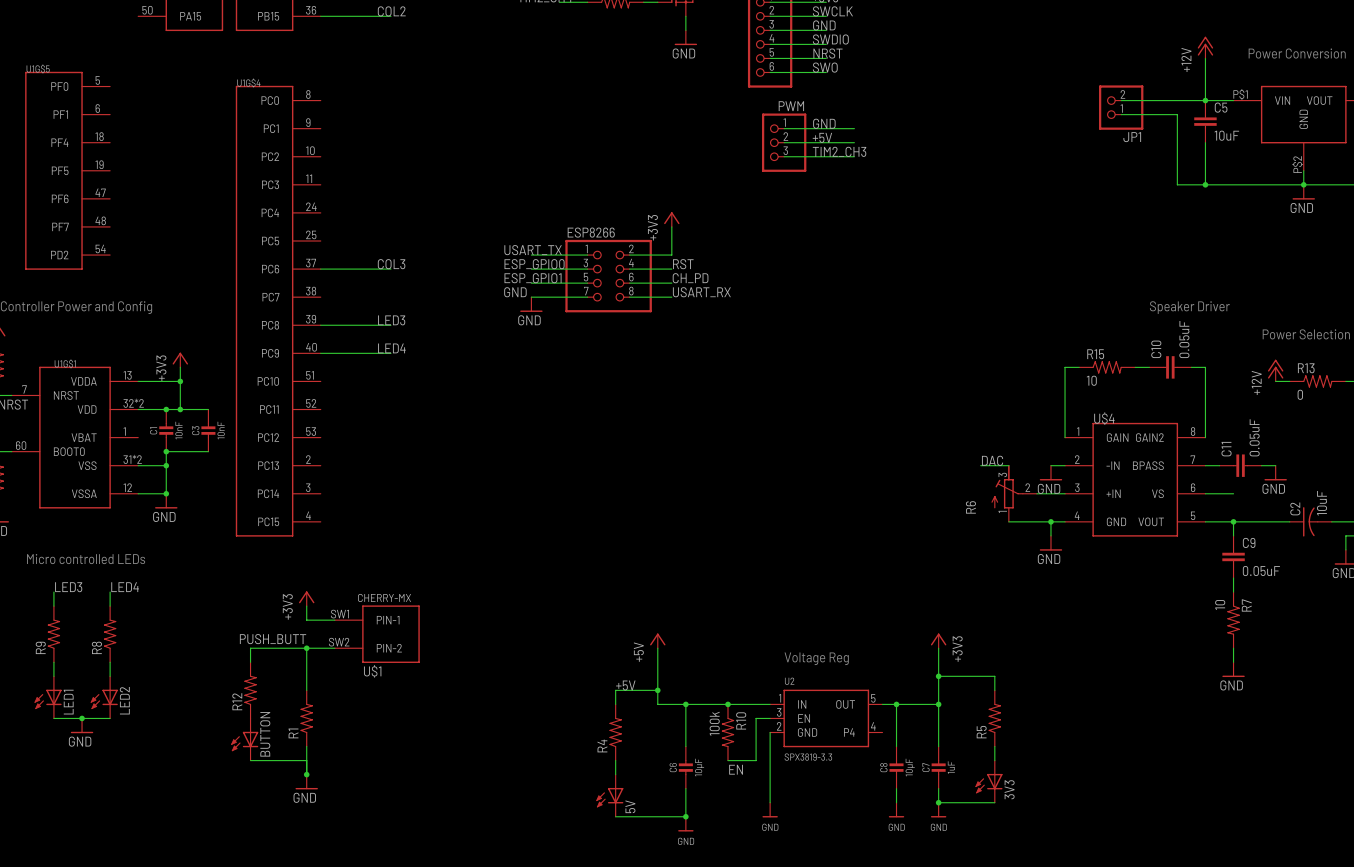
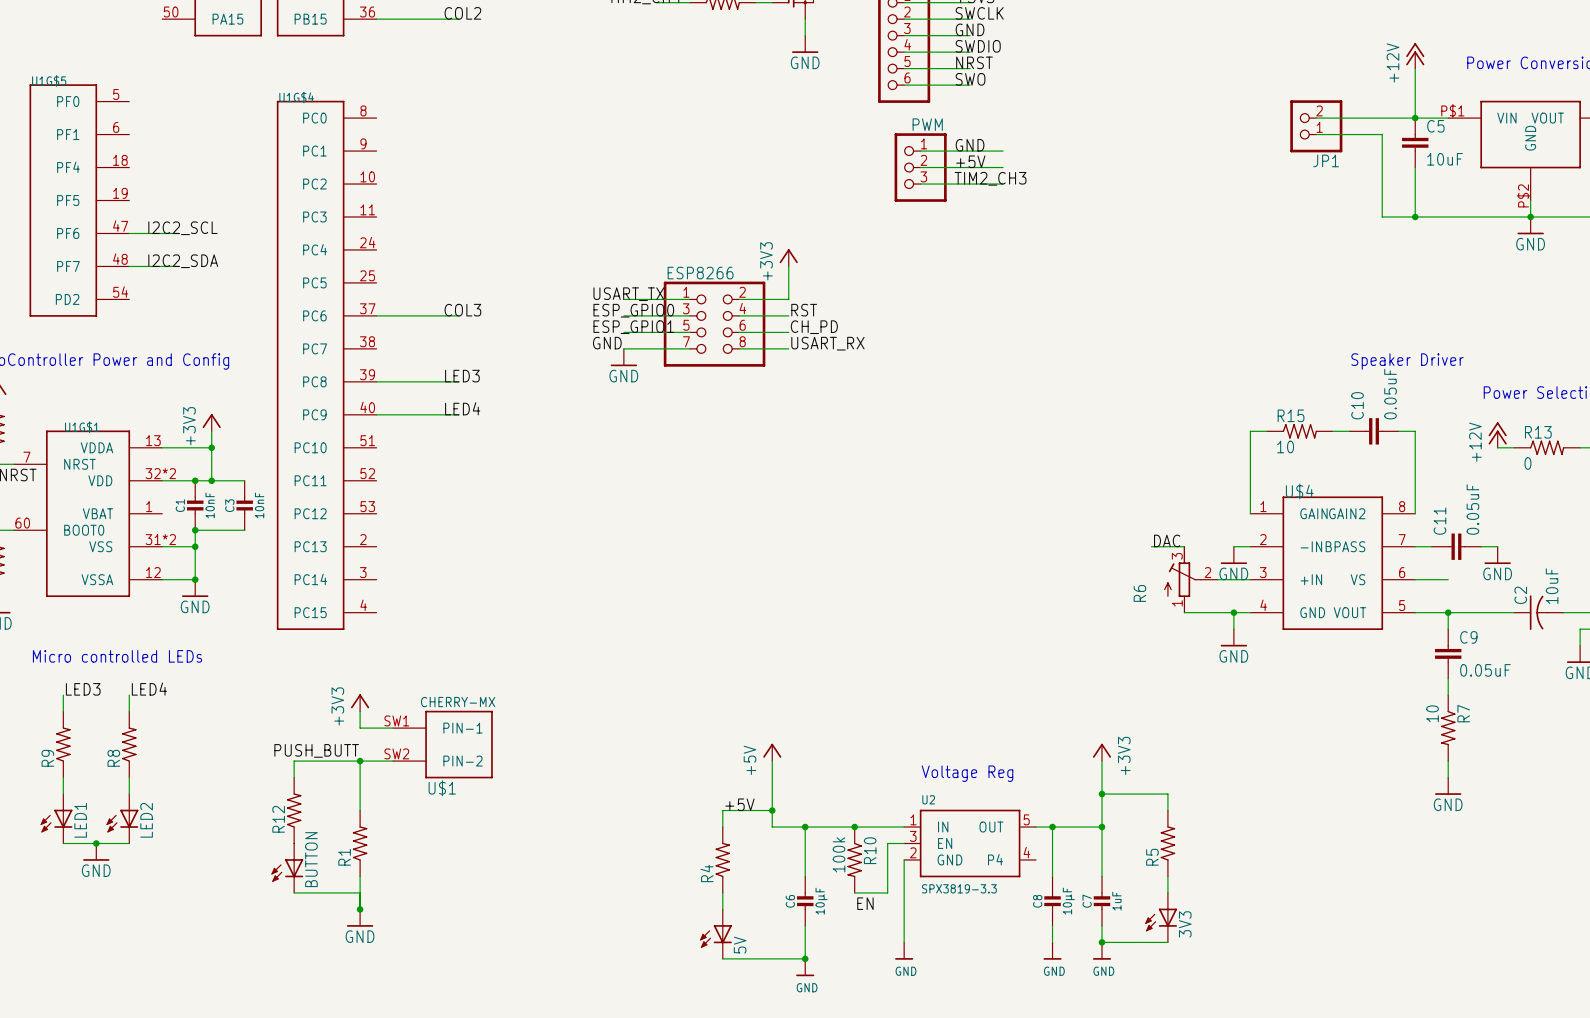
label: none -> I2C2_SCL (182, 228)
wire: none -> (129, 233) (178, 233)
label: none -> I2C2_SDA (183, 261)
wire: none -> (129, 266) (178, 266)

